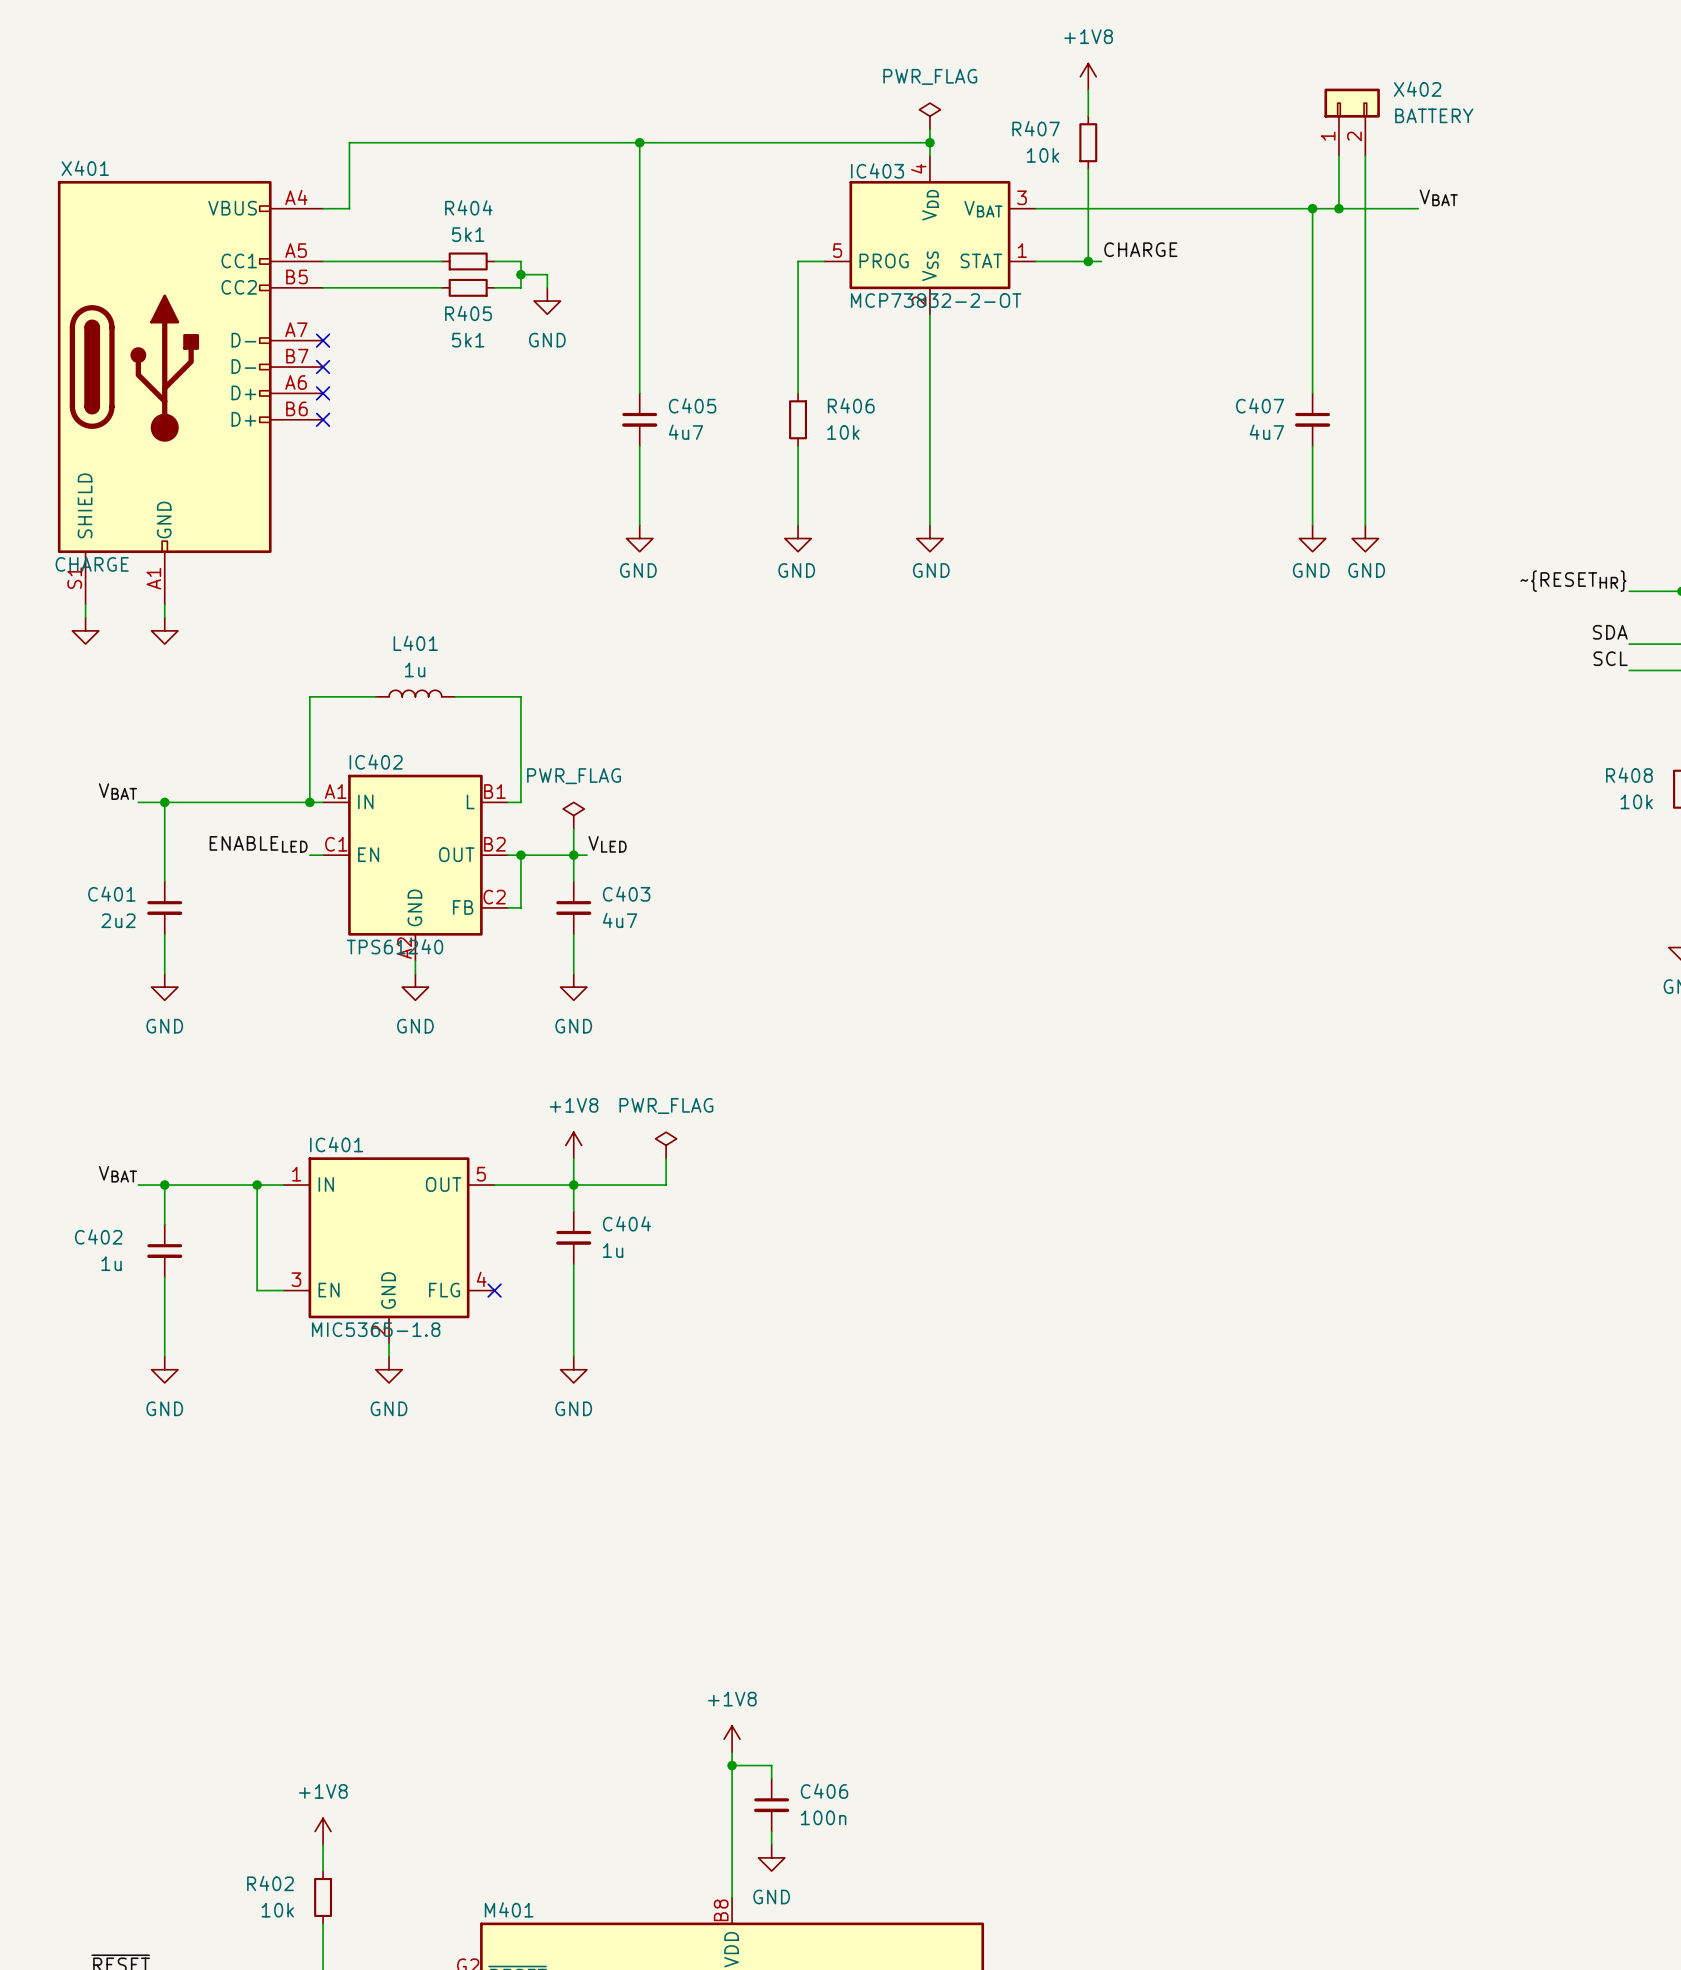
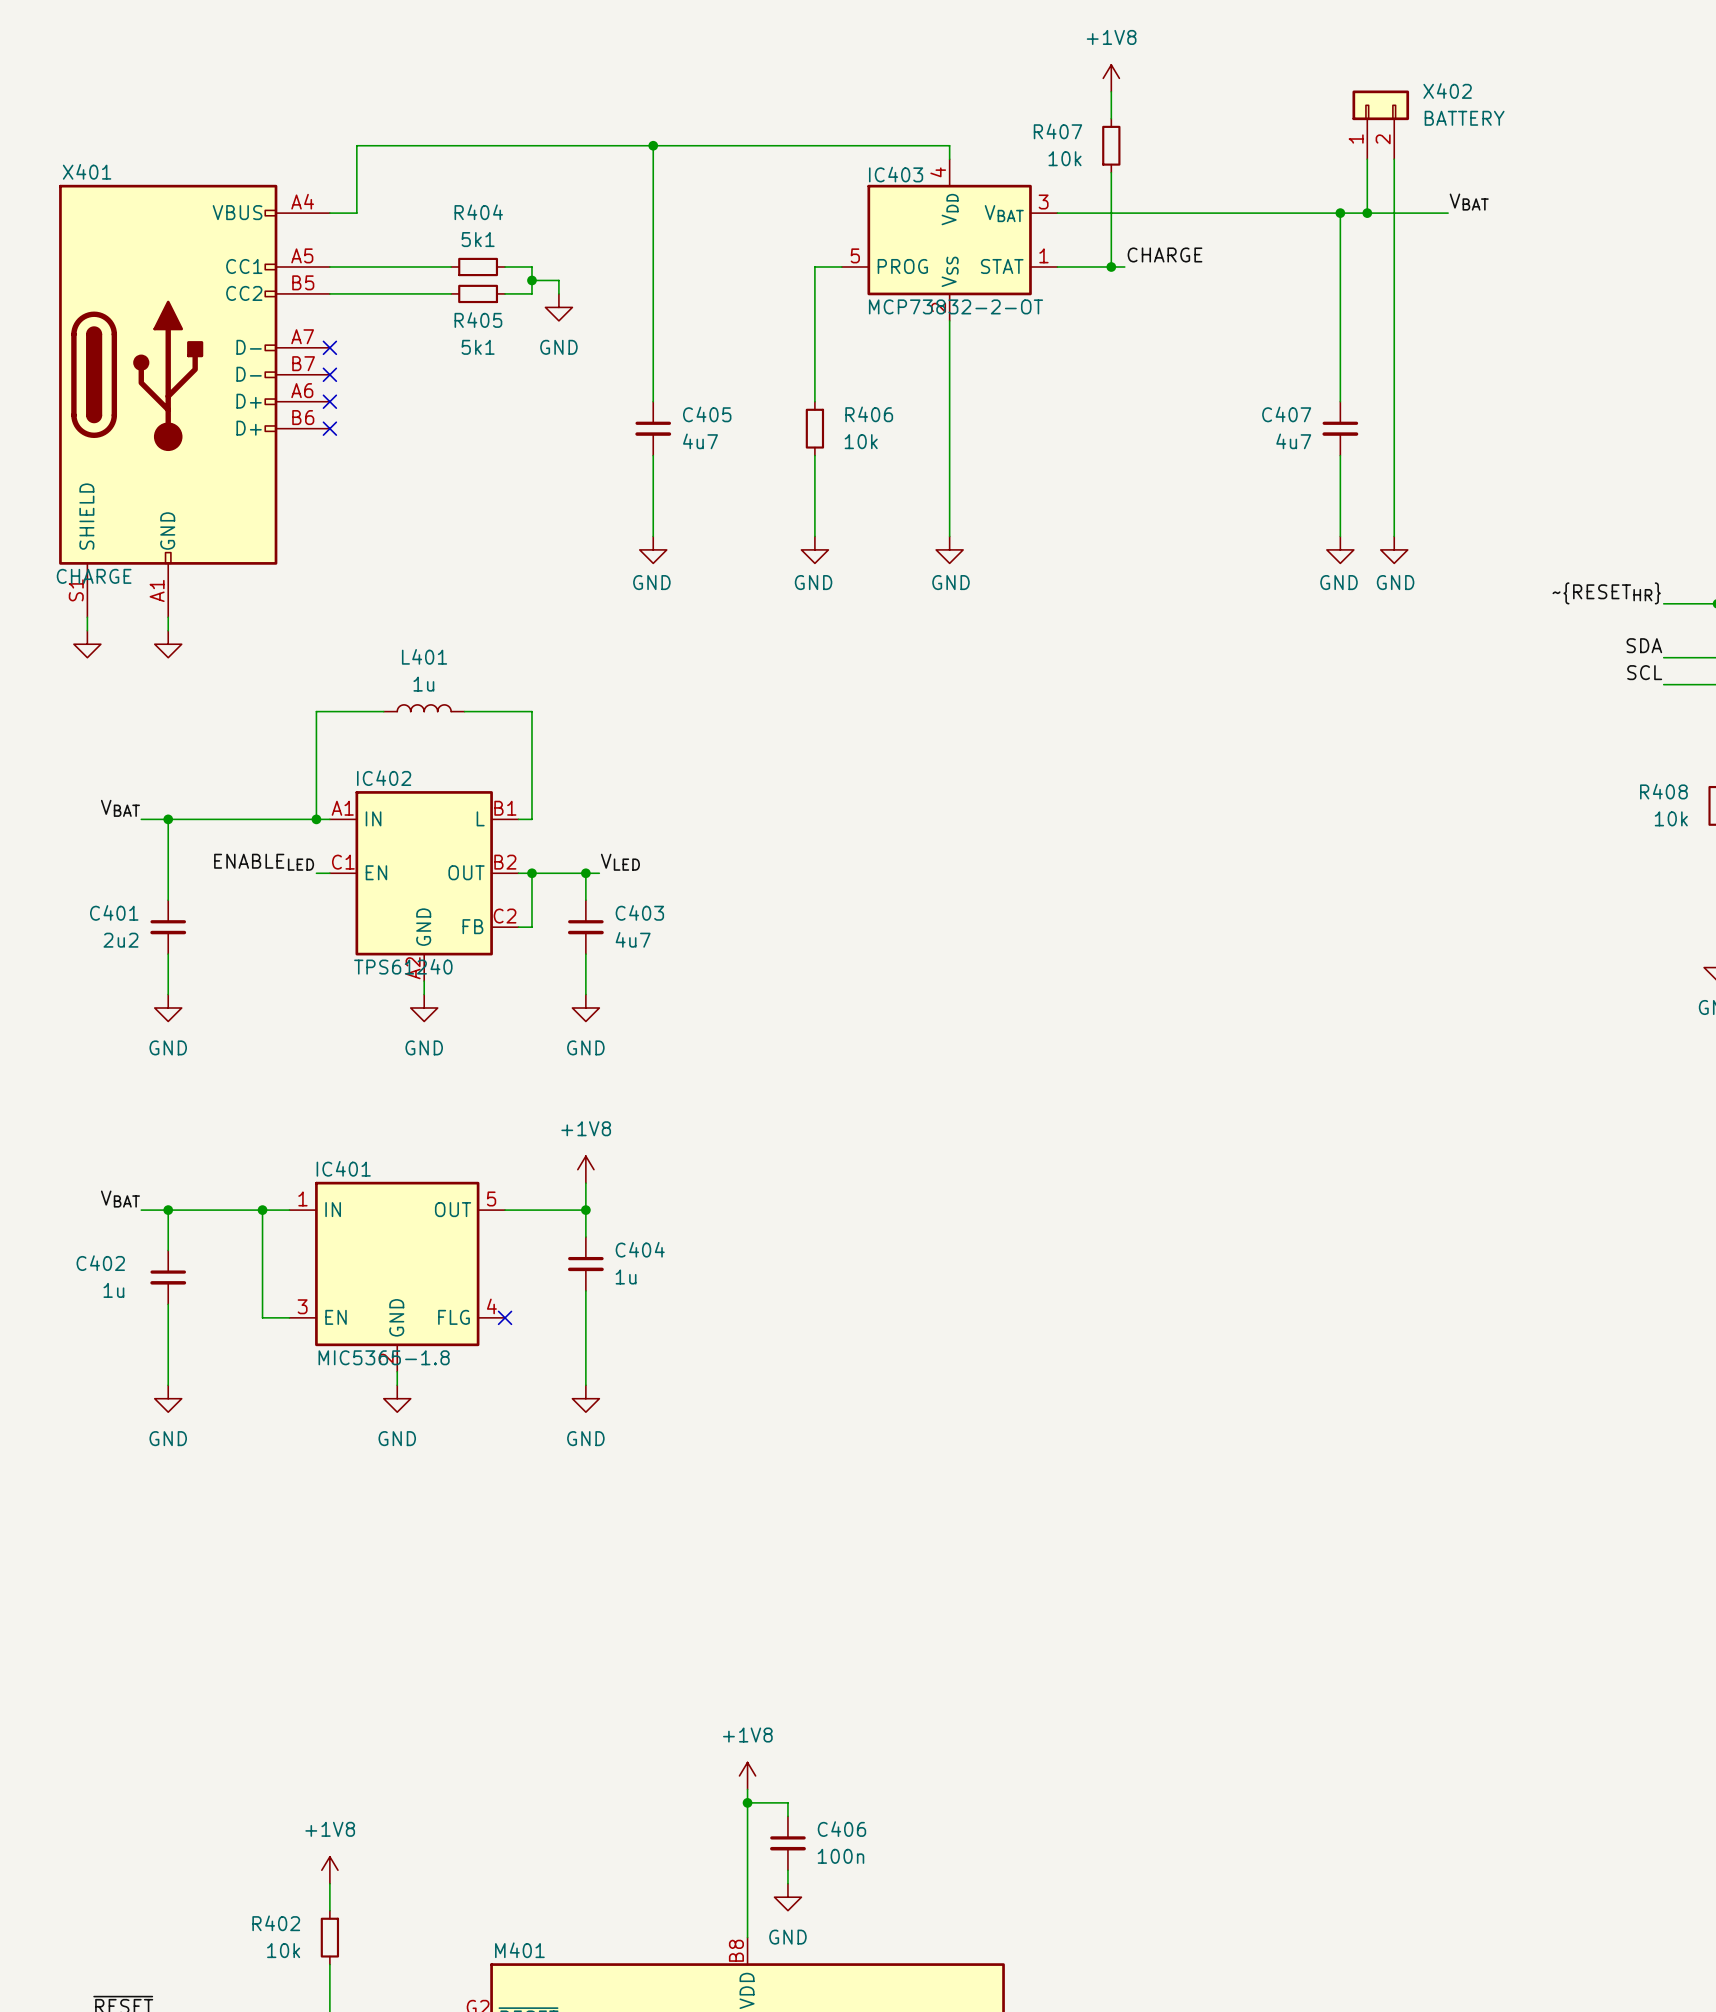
power symbol: PWR_FLAG (929, 116) -> none
wire: (929, 129) (929, 142) -> none
junction: (929, 142) -> none
power symbol: PWR_FLAG (573, 815) -> none
wire: (573, 828) (573, 855) -> none
power symbol: PWR_FLAG (666, 1145) -> none
wire: (666, 1158) (666, 1185) (573, 1185) -> none

